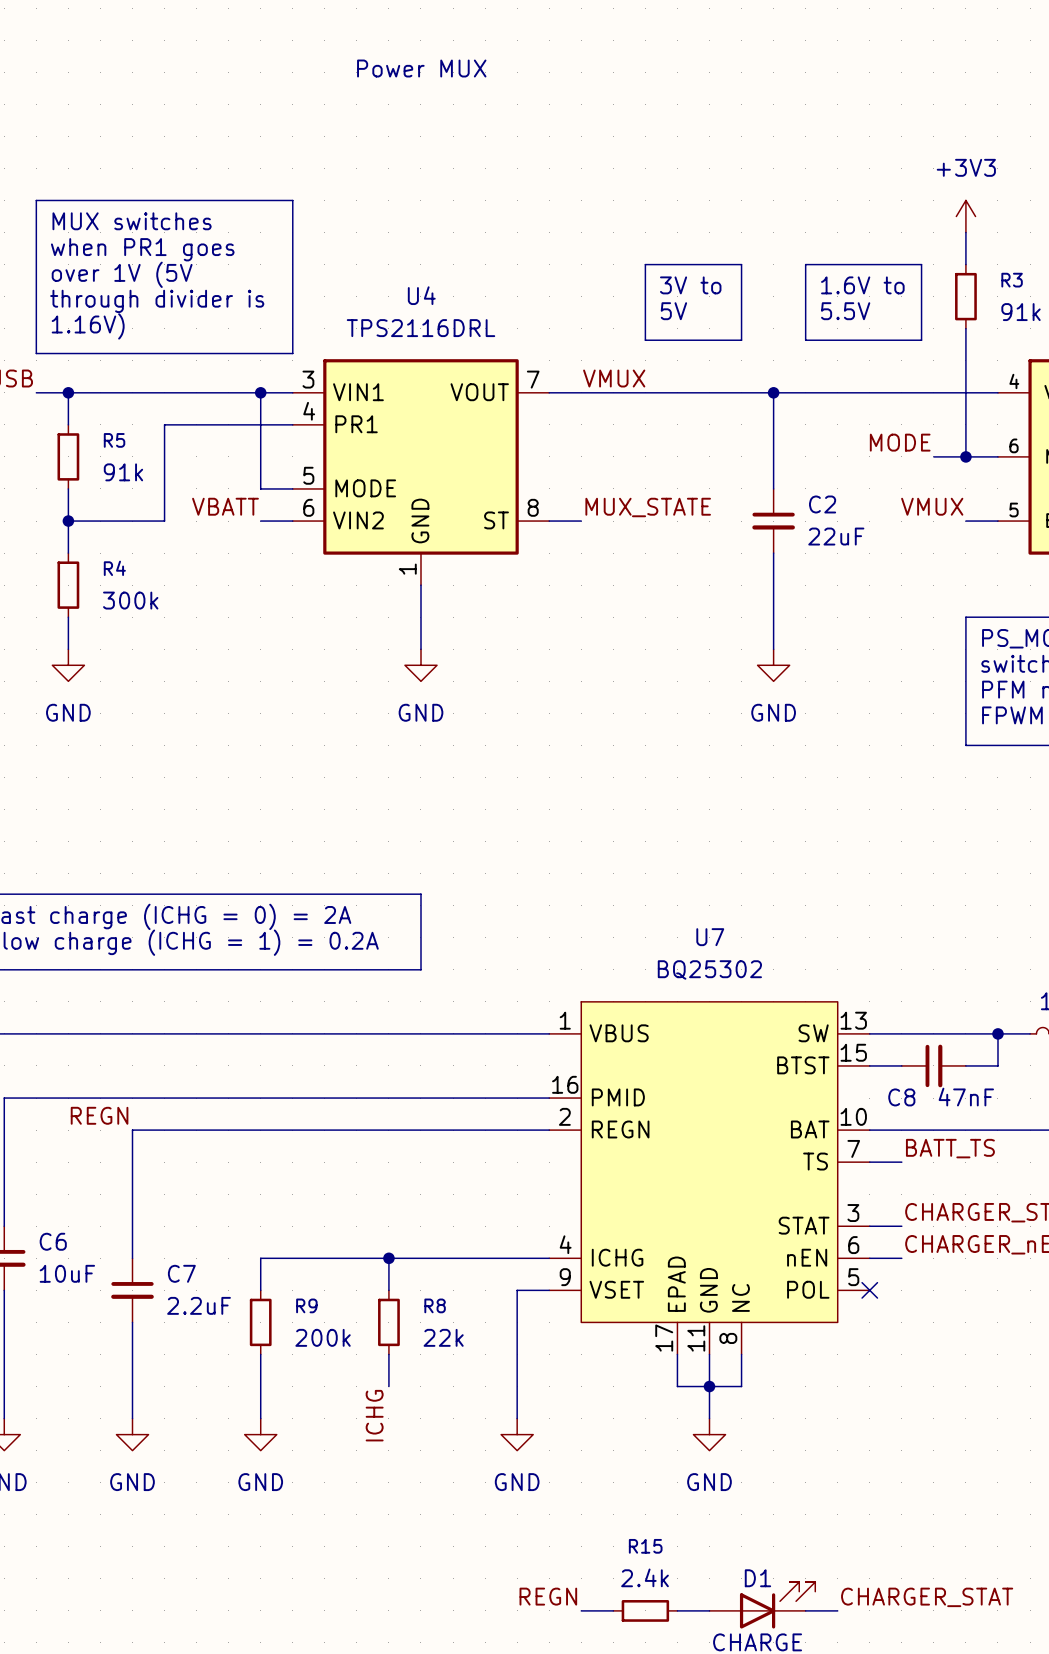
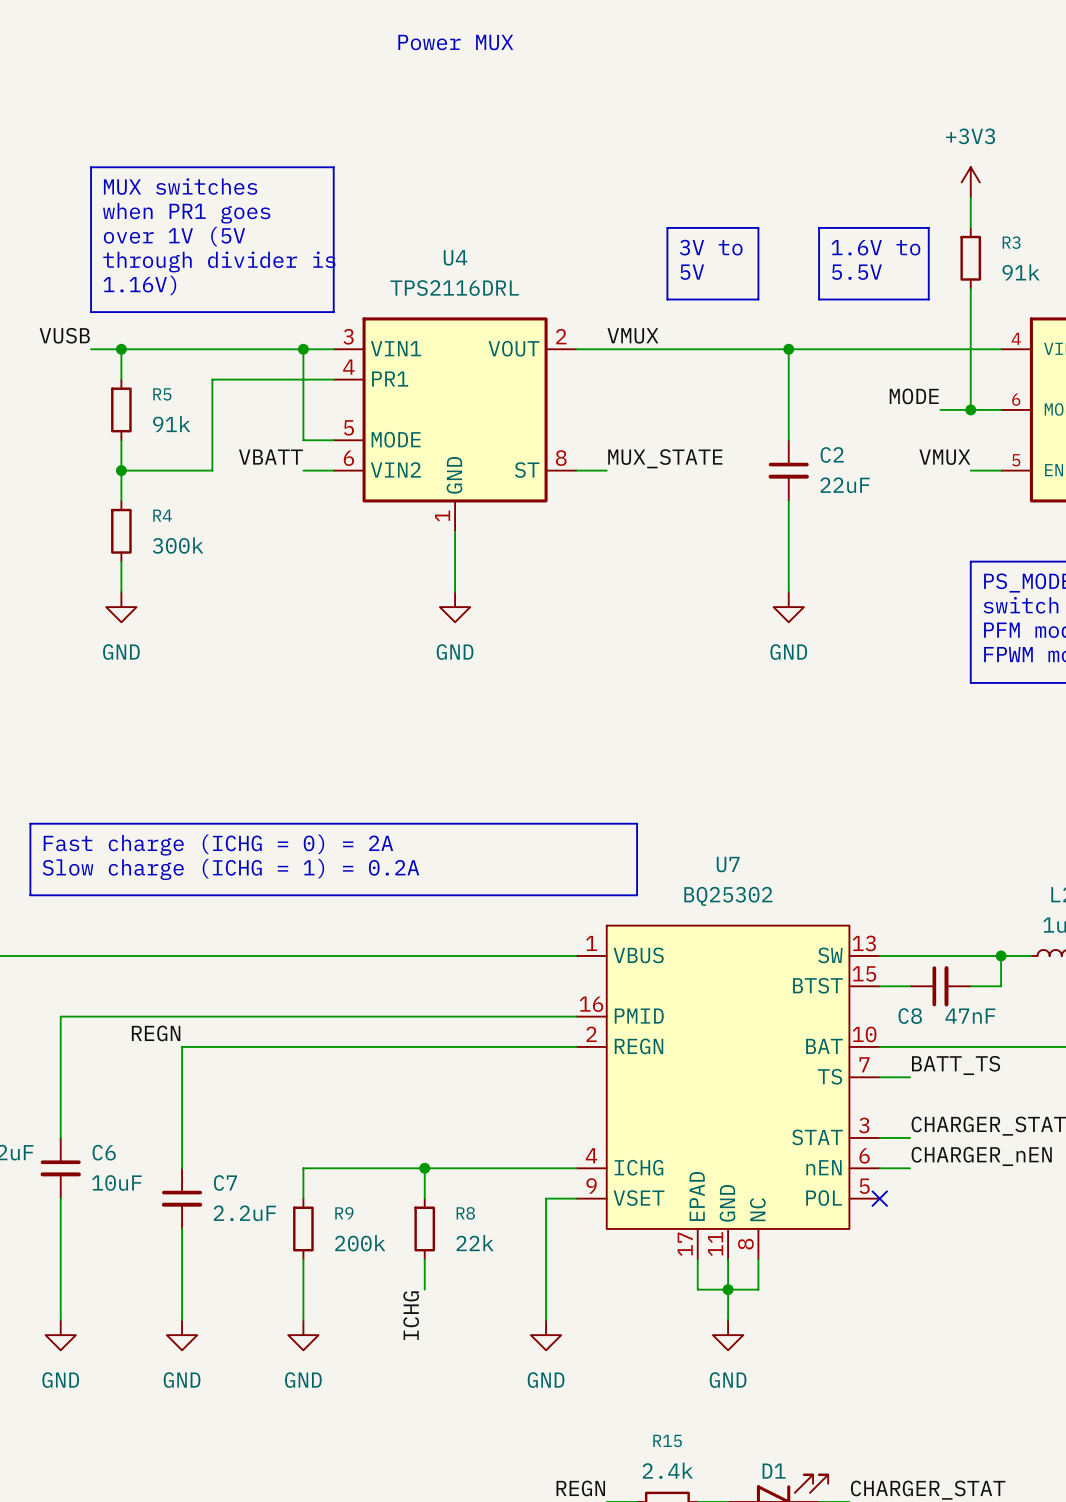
U4 pin number: 7 (533, 379) -> 2 (561, 336)
line: (420, 894) (420, 969) -> (455, 823) (637, 823) (637, 895) (455, 895)

